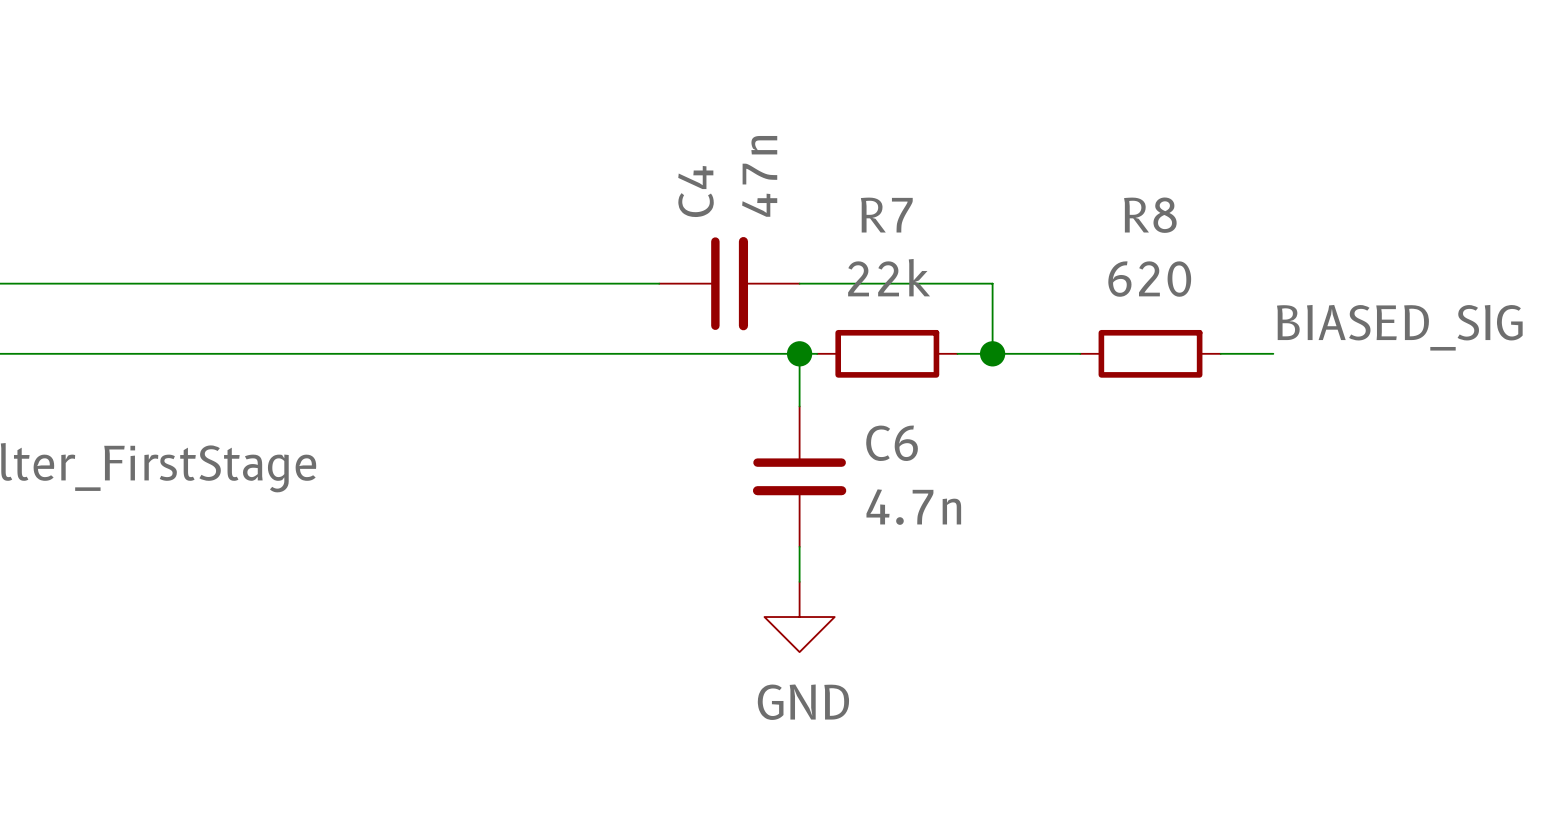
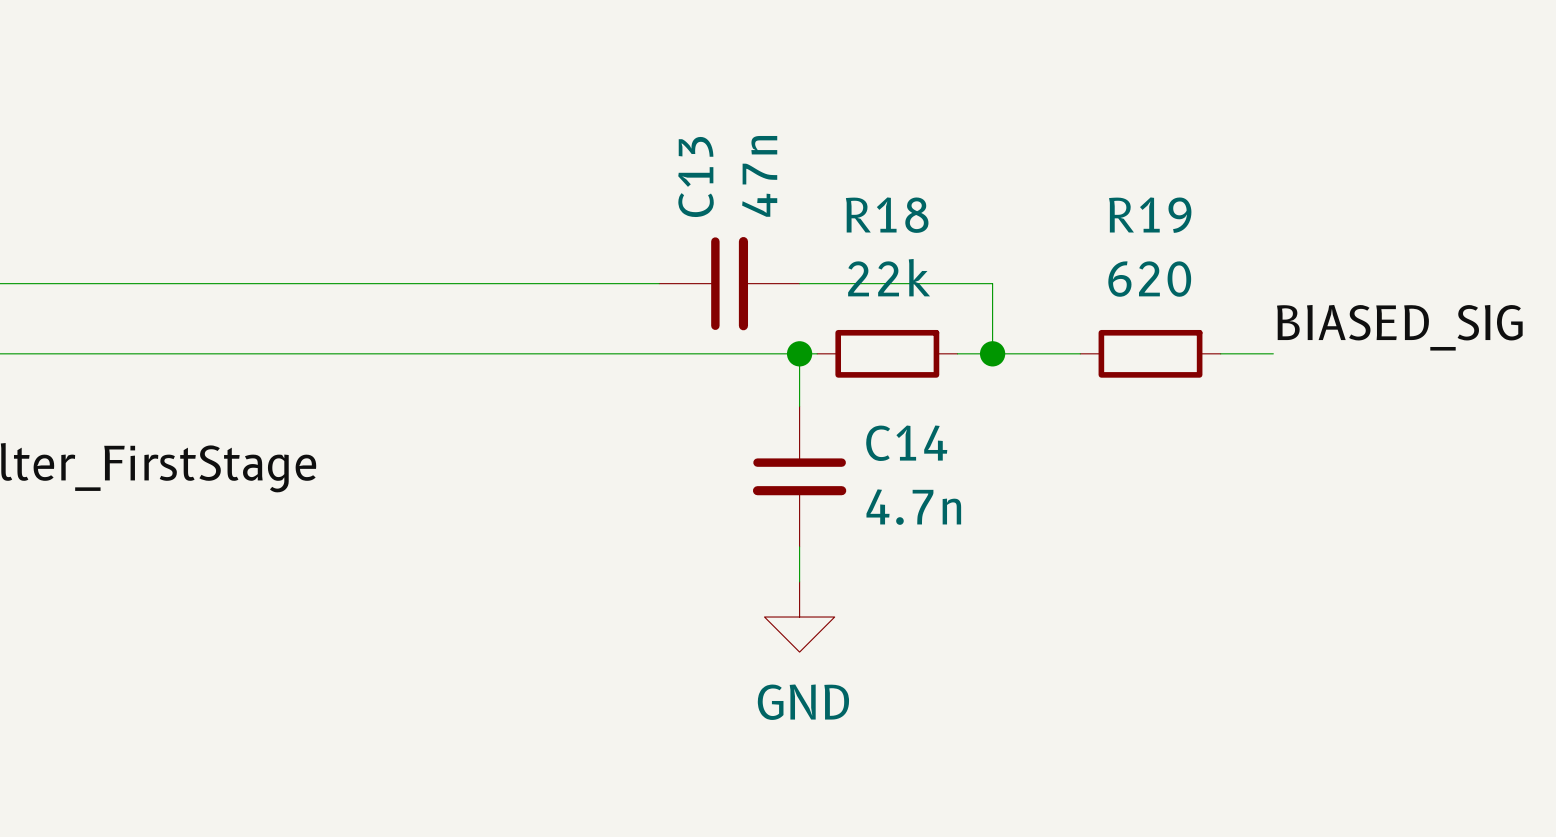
C4 name: C4 (696, 191) -> C13 (696, 176)
R7 name: R7 (886, 215) -> R18 (887, 215)
R8 name: R8 (1150, 215) -> R19 (1150, 215)
C6 name: C6 (892, 443) -> C14 (906, 443)

